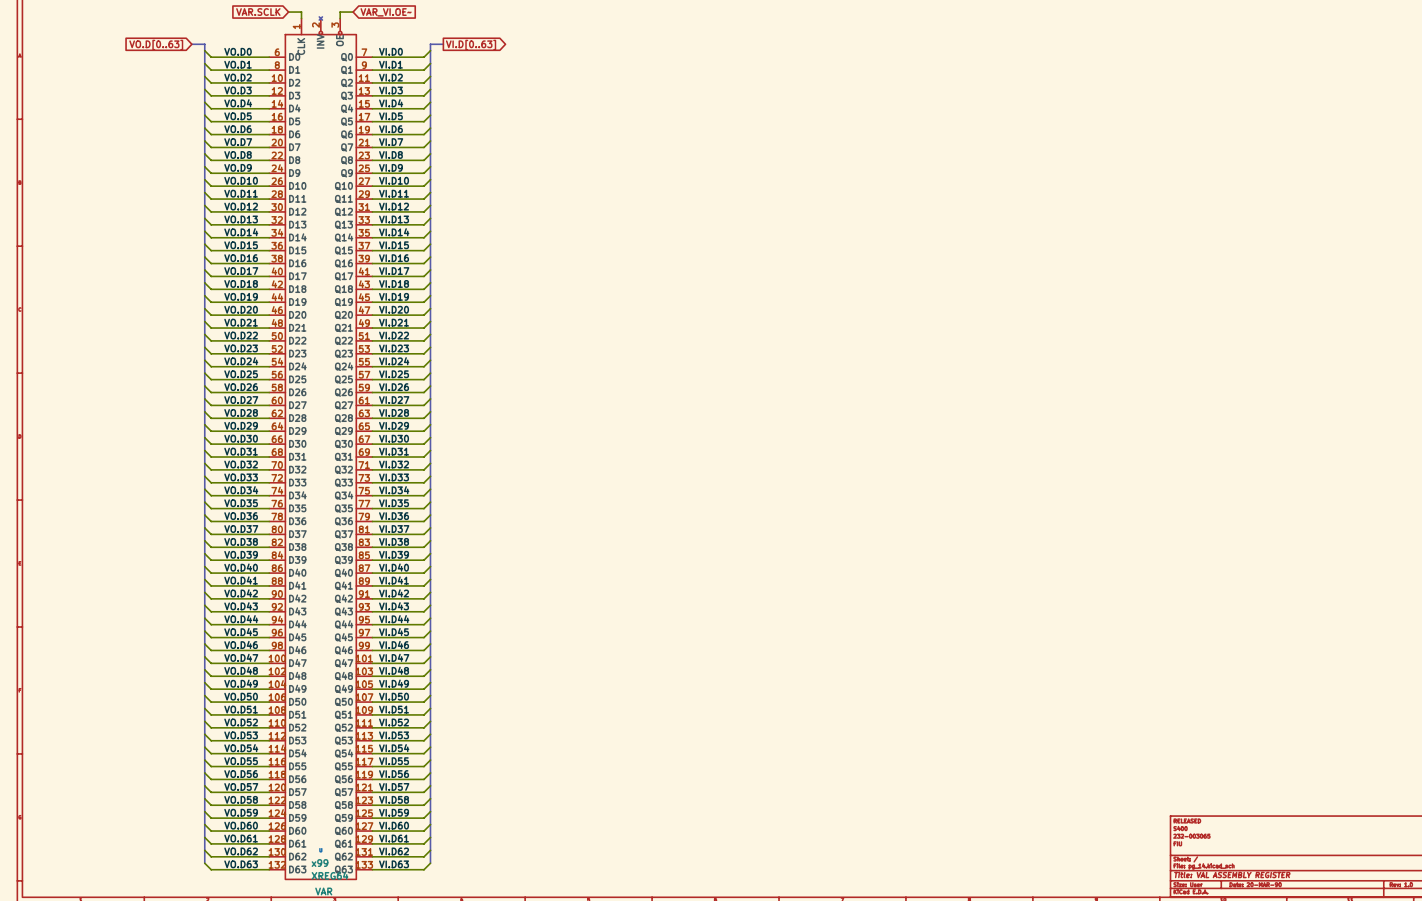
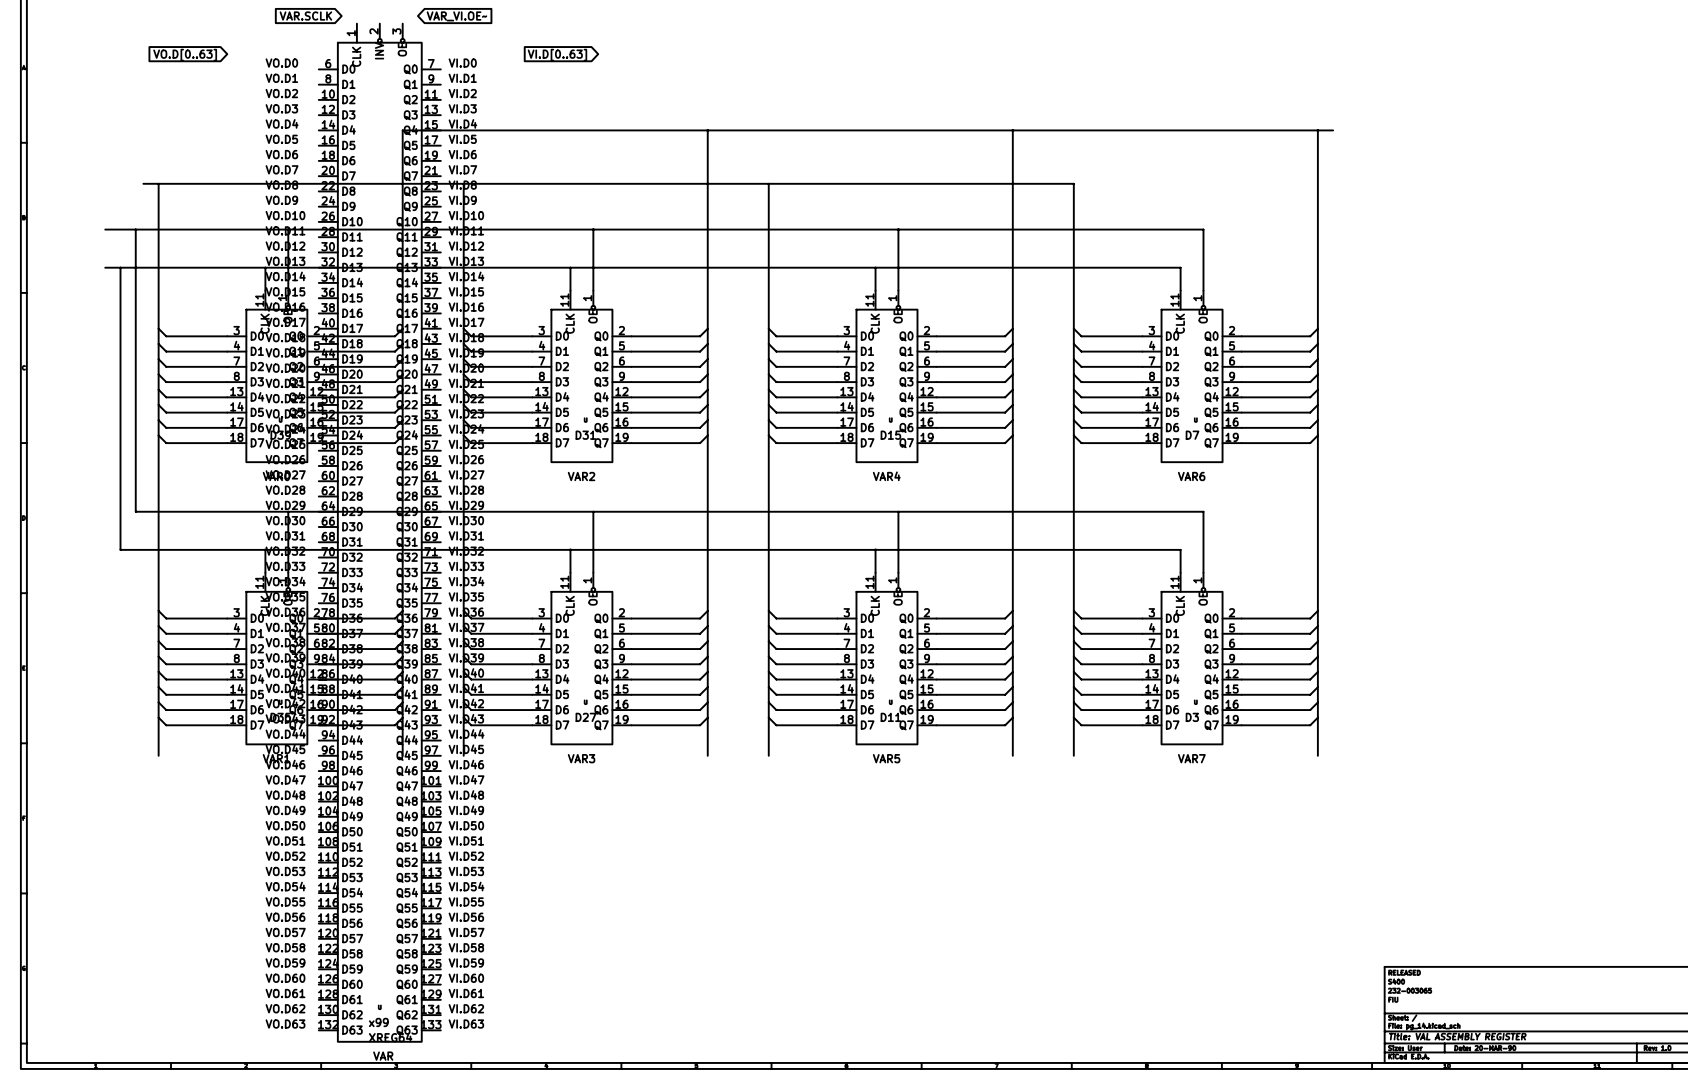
wire: (288, 12) (301, 12) (301, 18) -> none
wire: (353, 12) (340, 12) (340, 18) -> none
no-connect mark: (320, 18) -> none
bus: (191, 44) (204, 44) (204, 863) -> none
bus: (443, 44) (430, 44) (430, 863) -> none
wire: (204, 50) (211, 57) (269, 57) -> none
wire: (430, 50) (424, 57) (372, 57) -> none
wire: (204, 63) (211, 70) (269, 70) -> none
wire: (430, 63) (424, 70) (372, 70) -> none
wire: (204, 76) (211, 82) (269, 82) -> none
wire: (430, 76) (424, 82) (372, 82) -> none
wire: (204, 89) (211, 95) (269, 95) -> none
wire: (430, 89) (424, 95) (372, 95) -> none
wire: (204, 102) (211, 108) (269, 108) -> none
bus: none -> (707, 130) (707, 755)
bus: none -> (1012, 130) (1012, 755)
bus: none -> (1317, 130) (1317, 755)
bus: none -> (1333, 130) (402, 130) (402, 755)
wire: (204, 115) (211, 121) (269, 121) -> none
wire: (430, 115) (424, 121) (372, 121) -> none
wire: (204, 128) (211, 134) (269, 134) -> none
wire: (430, 128) (424, 134) (372, 134) -> none
wire: (204, 141) (211, 147) (269, 147) -> none
wire: (430, 141) (424, 147) (372, 147) -> none
bus: none -> (143, 183) (1073, 183) (1073, 755)
bus: none -> (158, 183) (158, 755)
wire: (204, 153) (211, 160) (269, 160) -> none
bus: none -> (463, 183) (463, 755)
wire: (430, 153) (424, 160) (372, 160) -> none
bus: none -> (768, 183) (768, 755)
wire: (204, 166) (211, 173) (269, 173) -> none
wire: (430, 166) (424, 173) (372, 173) -> none
wire: (204, 179) (211, 186) (269, 186) -> none
wire: (430, 179) (424, 186) (372, 186) -> none
wire: none -> (105, 229) (1203, 229) (1203, 290)
wire: (204, 192) (211, 199) (269, 199) -> none
wire: none -> (288, 229) (288, 290)
wire: (430, 192) (424, 199) (372, 199) -> none
wire: none -> (593, 229) (593, 290)
wire: none -> (898, 229) (898, 290)
wire: (204, 205) (211, 211) (269, 211) -> none
wire: (430, 205) (424, 211) (372, 211) -> none
wire: (204, 218) (211, 224) -> (105, 267) (250, 267)
wire: (430, 218) (424, 224) -> (1180, 290) (1180, 267) (501, 267)
wire: none -> (120, 267) (120, 549) (1180, 549) (1180, 572)
wire: none -> (265, 267) (265, 290)
wire: none -> (318, 267) (440, 267)
wire: none -> (570, 267) (570, 290)
wire: none -> (875, 267) (875, 290)
wire: (204, 231) (211, 237) (269, 237) -> none
wire: (430, 231) (424, 237) (372, 237) -> none
wire: (204, 244) (211, 250) (269, 250) -> none
wire: (430, 244) (424, 250) (372, 250) -> none
wire: (204, 257) (211, 263) (269, 263) -> none
wire: (430, 257) (424, 263) (372, 263) -> none
wire: (204, 269) (211, 276) (269, 276) -> none
wire: (430, 269) (424, 276) (372, 276) -> none
wire: none -> (158, 328) (166, 336) (227, 336)
wire: none -> (402, 328) (395, 336) (326, 336)
wire: none -> (463, 328) (471, 336) (532, 336)
wire: none -> (707, 328) (700, 336) (631, 336)
wire: none -> (768, 328) (776, 336) (837, 336)
wire: none -> (1012, 328) (1005, 336) (936, 336)
wire: none -> (1073, 328) (1081, 336) (1142, 336)
wire: none -> (1317, 328) (1310, 336) (1241, 336)
wire: (204, 282) (211, 289) (269, 289) -> none
wire: (430, 282) (424, 289) (372, 289) -> none
wire: none -> (158, 343) (166, 351) (227, 351)
wire: none -> (402, 343) (395, 351) (326, 351)
wire: none -> (463, 343) (471, 351) (532, 351)
wire: none -> (707, 343) (700, 351) (631, 351)
wire: none -> (768, 343) (776, 351) (837, 351)
wire: none -> (1012, 343) (1005, 351) (936, 351)
wire: none -> (1073, 343) (1081, 351) (1142, 351)
wire: none -> (1317, 343) (1310, 351) (1241, 351)
wire: (204, 295) (211, 302) (269, 302) -> none
wire: (430, 295) (424, 302) (372, 302) -> none
wire: none -> (158, 359) (166, 366) (227, 366)
wire: none -> (402, 359) (395, 366) (326, 366)
wire: none -> (463, 359) (471, 366) (532, 366)
wire: none -> (707, 359) (700, 366) (631, 366)
wire: none -> (768, 359) (776, 366) (837, 366)
wire: none -> (1012, 359) (1005, 366) (936, 366)
wire: none -> (1073, 359) (1081, 366) (1142, 366)
wire: none -> (1317, 359) (1310, 366) (1241, 366)
wire: (204, 308) (211, 315) (269, 315) -> none
wire: (430, 308) (424, 315) (372, 315) -> none
wire: none -> (158, 374) (166, 382) (227, 382)
wire: none -> (402, 374) (395, 382) (326, 382)
wire: none -> (463, 374) (471, 382) (532, 382)
wire: none -> (707, 374) (700, 382) (631, 382)
wire: none -> (768, 374) (776, 382) (837, 382)
wire: none -> (1012, 374) (1005, 382) (936, 382)
wire: none -> (1073, 374) (1081, 382) (1142, 382)
wire: none -> (1317, 374) (1310, 382) (1241, 382)
part: none -> (276, 376)
part: none -> (581, 376)
part: none -> (886, 376)
part: none -> (1192, 376)
wire: (204, 321) (211, 328) (269, 328) -> none
wire: (430, 321) (424, 328) (372, 328) -> none
wire: none -> (158, 389) (166, 397) (227, 397)
wire: none -> (402, 389) (395, 397) (326, 397)
wire: none -> (463, 389) (471, 397) (532, 397)
wire: none -> (707, 389) (700, 397) (631, 397)
wire: none -> (768, 389) (776, 397) (837, 397)
wire: none -> (1012, 389) (1005, 397) (936, 397)
wire: none -> (1073, 389) (1081, 397) (1142, 397)
wire: none -> (1317, 389) (1310, 397) (1241, 397)
wire: (204, 334) (211, 340) (269, 340) -> none
wire: (430, 334) (424, 340) (372, 340) -> none
wire: none -> (158, 404) (166, 412) (227, 412)
wire: none -> (402, 404) (395, 412) (326, 412)
wire: none -> (463, 404) (471, 412) (532, 412)
wire: none -> (707, 404) (700, 412) (631, 412)
wire: none -> (768, 404) (776, 412) (837, 412)
wire: none -> (1012, 404) (1005, 412) (936, 412)
wire: none -> (1073, 404) (1081, 412) (1142, 412)
wire: none -> (1317, 404) (1310, 412) (1241, 412)
wire: (204, 347) (211, 353) (269, 353) -> none
wire: (430, 347) (424, 353) (372, 353) -> none
wire: none -> (158, 420) (166, 427) (227, 427)
wire: none -> (402, 420) (395, 427) (326, 427)
wire: none -> (463, 420) (471, 427) (532, 427)
wire: none -> (707, 420) (700, 427) (631, 427)
wire: none -> (768, 420) (776, 427) (837, 427)
wire: none -> (1012, 420) (1005, 427) (936, 427)
wire: none -> (1073, 420) (1081, 427) (1142, 427)
wire: none -> (1317, 420) (1310, 427) (1241, 427)
wire: (204, 360) (211, 366) (269, 366) -> none
wire: (430, 360) (424, 366) (372, 366) -> none
wire: none -> (158, 435) (166, 443) (227, 443)
wire: none -> (402, 435) (395, 443) (326, 443)
wire: none -> (463, 435) (471, 443) (532, 443)
wire: none -> (707, 435) (700, 443) (631, 443)
wire: none -> (768, 435) (776, 443) (837, 443)
wire: none -> (1012, 435) (1005, 443) (936, 443)
wire: none -> (1073, 435) (1081, 443) (1142, 443)
wire: none -> (1317, 435) (1310, 443) (1241, 443)
wire: (204, 373) (211, 379) (269, 379) -> none
wire: (430, 373) (424, 379) (372, 379) -> none
wire: (204, 386) (211, 392) (269, 392) -> none
wire: (430, 386) (424, 392) (372, 392) -> none
wire: (204, 398) (211, 405) (269, 405) -> none
wire: (430, 398) (424, 405) (372, 405) -> none
wire: (204, 411) (211, 418) (269, 418) -> none
wire: (430, 411) (424, 418) (372, 418) -> none
wire: (204, 424) (211, 431) -> (135, 229) (135, 511) (250, 511)
wire: (430, 424) (424, 431) -> (1203, 572) (1203, 511) (501, 511)
wire: none -> (288, 511) (288, 572)
wire: none -> (318, 511) (440, 511)
wire: none -> (593, 511) (593, 572)
wire: none -> (898, 511) (898, 572)
wire: (204, 437) (211, 444) (269, 444) -> none
wire: (430, 437) (424, 444) (372, 444) -> none
wire: (204, 450) (211, 457) (269, 457) -> none
wire: (430, 450) (424, 457) (372, 457) -> none
wire: (204, 463) (211, 469) (269, 469) -> none
wire: none -> (265, 549) (265, 572)
wire: (430, 463) (424, 469) (372, 469) -> none
wire: none -> (570, 549) (570, 572)
wire: none -> (875, 549) (875, 572)
wire: (204, 476) (211, 482) (269, 482) -> none
wire: (430, 476) (424, 482) (372, 482) -> none
wire: (204, 489) (211, 495) (269, 495) -> none
wire: (430, 489) (424, 495) (372, 495) -> none
wire: (204, 502) (211, 508) (269, 508) -> none
wire: (430, 502) (424, 508) (372, 508) -> none
wire: none -> (158, 610) (166, 618) (227, 618)
wire: (204, 515) (211, 521) (269, 521) -> none
wire: none -> (402, 610) (395, 618) (326, 618)
wire: (430, 515) (424, 521) -> (532, 618) (501, 618)
wire: none -> (707, 610) (700, 618) (631, 618)
wire: none -> (768, 610) (776, 618) (837, 618)
wire: none -> (1012, 610) (1005, 618) (936, 618)
wire: none -> (1073, 610) (1081, 618) (1142, 618)
wire: none -> (1317, 610) (1310, 618) (1241, 618)
wire: (372, 521) (398, 521) -> (463, 610) (471, 618)
wire: none -> (158, 626) (166, 633) (227, 633)
wire: (204, 527) (211, 534) (269, 534) -> none
wire: none -> (402, 626) (395, 633) (326, 633)
wire: (430, 527) (424, 534) -> (532, 633) (501, 633)
wire: none -> (707, 626) (700, 633) (631, 633)
wire: none -> (768, 626) (776, 633) (837, 633)
wire: none -> (1012, 626) (1005, 633) (936, 633)
wire: none -> (1073, 626) (1081, 633) (1142, 633)
wire: none -> (1317, 626) (1310, 633) (1241, 633)
wire: (372, 534) (398, 534) -> (463, 626) (471, 633)
wire: none -> (158, 641) (166, 649) (227, 649)
wire: (204, 540) (211, 547) (269, 547) -> none
wire: none -> (402, 641) (395, 649) (326, 649)
wire: (430, 540) (424, 547) -> (532, 649) (501, 649)
wire: none -> (707, 641) (700, 649) (631, 649)
wire: none -> (768, 641) (776, 649) (837, 649)
wire: none -> (1012, 641) (1005, 649) (936, 649)
wire: none -> (1073, 641) (1081, 649) (1142, 649)
wire: none -> (1317, 641) (1310, 649) (1241, 649)
wire: (372, 547) (398, 547) -> (463, 641) (471, 649)
wire: none -> (158, 656) (166, 664) (227, 664)
wire: (204, 553) (211, 560) (269, 560) -> none
wire: none -> (402, 656) (395, 664) (326, 664)
wire: (430, 553) (424, 560) -> (532, 664) (501, 664)
wire: none -> (707, 656) (700, 664) (631, 664)
wire: none -> (768, 656) (776, 664) (837, 664)
wire: none -> (1012, 656) (1005, 664) (936, 664)
wire: none -> (1073, 656) (1081, 664) (1142, 664)
wire: none -> (1317, 656) (1310, 664) (1241, 664)
part: none -> (276, 658)
part: none -> (581, 658)
part: none -> (886, 658)
part: none -> (1192, 658)
wire: (372, 560) (398, 560) -> (463, 656) (471, 664)
wire: none -> (158, 671) (166, 679) (227, 679)
wire: (204, 566) (211, 573) (269, 573) -> none
wire: none -> (402, 671) (395, 679) (326, 679)
wire: (430, 566) (424, 573) -> (532, 679) (501, 679)
wire: none -> (707, 671) (700, 679) (631, 679)
wire: none -> (768, 671) (776, 679) (837, 679)
wire: none -> (1012, 671) (1005, 679) (936, 679)
wire: none -> (1073, 671) (1081, 679) (1142, 679)
wire: none -> (1317, 671) (1310, 679) (1241, 679)
wire: (372, 573) (398, 573) -> (463, 671) (471, 679)
wire: none -> (158, 687) (166, 694) (227, 694)
wire: (204, 579) (211, 585) (269, 585) -> none
wire: none -> (402, 687) (395, 694) (326, 694)
wire: (430, 579) (424, 585) -> (532, 694) (501, 694)
wire: none -> (707, 687) (700, 694) (631, 694)
wire: none -> (768, 687) (776, 694) (837, 694)
wire: none -> (1012, 687) (1005, 694) (936, 694)
wire: none -> (1073, 687) (1081, 694) (1142, 694)
wire: none -> (1317, 687) (1310, 694) (1241, 694)
wire: (372, 585) (398, 585) -> (463, 687) (471, 694)
wire: none -> (158, 702) (166, 710) (227, 710)
wire: (204, 592) (211, 598) (269, 598) -> none
wire: none -> (402, 702) (395, 710) (326, 710)
wire: (430, 592) (424, 598) -> (532, 710) (501, 710)
wire: none -> (707, 702) (700, 710) (631, 710)
wire: none -> (768, 702) (776, 710) (837, 710)
wire: none -> (1012, 702) (1005, 710) (936, 710)
wire: none -> (1073, 702) (1081, 710) (1142, 710)
wire: none -> (1317, 702) (1310, 710) (1241, 710)
wire: (372, 598) (398, 598) -> (463, 702) (471, 710)
wire: none -> (158, 717) (166, 725) (227, 725)
wire: (204, 605) (211, 611) (269, 611) -> none
wire: none -> (402, 717) (395, 725) (326, 725)
wire: (430, 605) (424, 611) -> (532, 725) (501, 725)
wire: none -> (707, 717) (700, 725) (631, 725)
wire: none -> (768, 717) (776, 725) (837, 725)
wire: none -> (1012, 717) (1005, 725) (936, 725)
wire: none -> (1073, 717) (1081, 725) (1142, 725)
wire: none -> (1317, 717) (1310, 725) (1241, 725)
wire: (372, 611) (398, 611) -> (463, 717) (471, 725)
wire: (204, 618) (211, 624) (269, 624) -> none
wire: (430, 618) (424, 624) (372, 624) -> none
wire: (204, 631) (211, 637) (269, 637) -> none
wire: (430, 631) (424, 637) (372, 637) -> none
wire: (204, 644) (211, 650) (269, 650) -> none
wire: (430, 644) (424, 650) (372, 650) -> none
wire: (204, 656) (211, 663) (269, 663) -> none
wire: (430, 656) (424, 663) (372, 663) -> none
wire: (204, 669) (211, 676) (269, 676) -> none
wire: (430, 669) (424, 676) (372, 676) -> none
wire: (204, 682) (211, 689) (269, 689) -> none
wire: (430, 682) (424, 689) (372, 689) -> none
wire: (204, 695) (211, 702) (269, 702) -> none
wire: (430, 695) (424, 702) (372, 702) -> none
wire: (204, 708) (211, 714) (269, 714) -> none
wire: (430, 708) (424, 714) (372, 714) -> none
wire: (204, 721) (211, 727) (269, 727) -> none
wire: (430, 721) (424, 727) (372, 727) -> none
wire: (204, 734) (211, 740) (269, 740) -> none
wire: (430, 734) (424, 740) (372, 740) -> none
wire: (204, 747) (211, 753) (269, 753) -> none
wire: (430, 747) (424, 753) (372, 753) -> none
wire: (204, 760) (211, 766) (269, 766) -> none
wire: (430, 760) (424, 766) (372, 766) -> none
wire: (204, 772) (211, 779) (269, 779) -> none
wire: (430, 772) (424, 779) (372, 779) -> none
wire: (204, 785) (211, 792) (269, 792) -> none
wire: (430, 785) (424, 792) (372, 792) -> none
wire: (204, 798) (211, 805) (269, 805) -> none
wire: (430, 798) (424, 805) (372, 805) -> none
wire: (204, 811) (211, 818) (269, 818) -> none
wire: (430, 811) (424, 818) (372, 818) -> none
wire: (204, 824) (211, 831) (269, 831) -> none
wire: (430, 824) (424, 831) (372, 831) -> none
wire: (204, 837) (211, 843) (269, 843) -> none
wire: (430, 837) (424, 843) (372, 843) -> none
wire: (204, 850) (211, 856) (269, 856) -> none
wire: (430, 850) (424, 856) (372, 856) -> none
wire: (204, 863) (211, 869) (269, 869) -> none
wire: (430, 863) (424, 869) (372, 869) -> none

